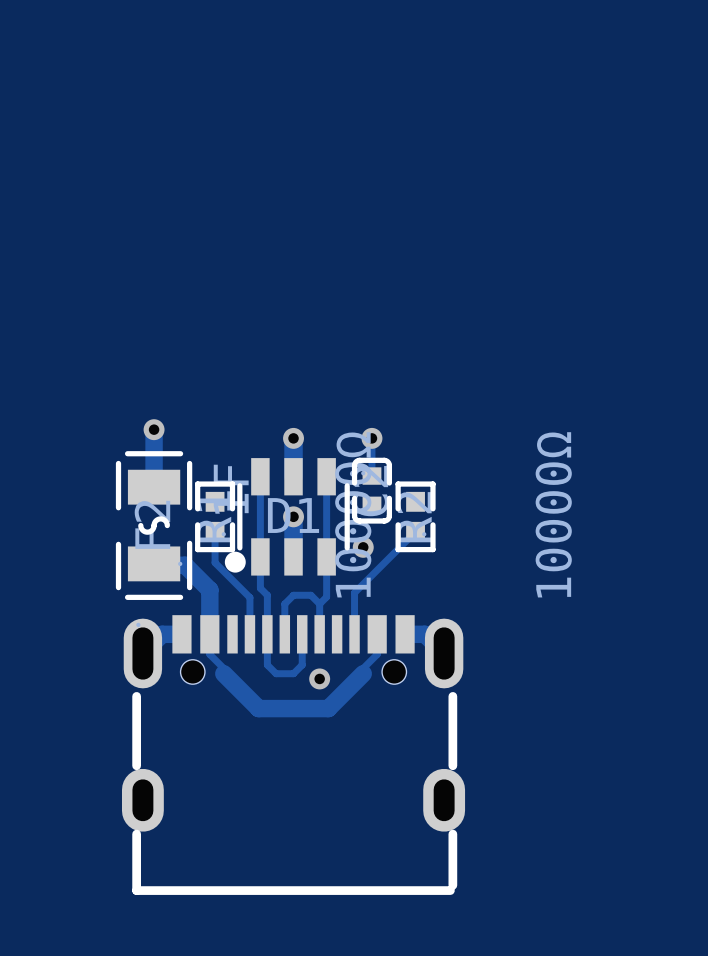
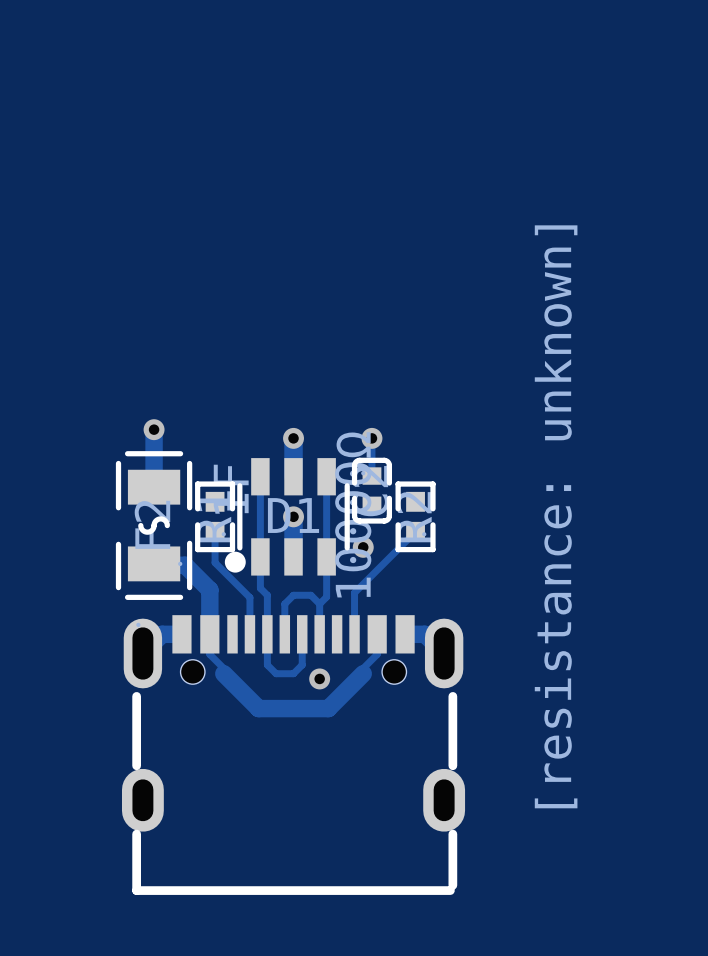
part value: 10000Ω (553, 514) -> [resistance: unknown] (556, 516)

